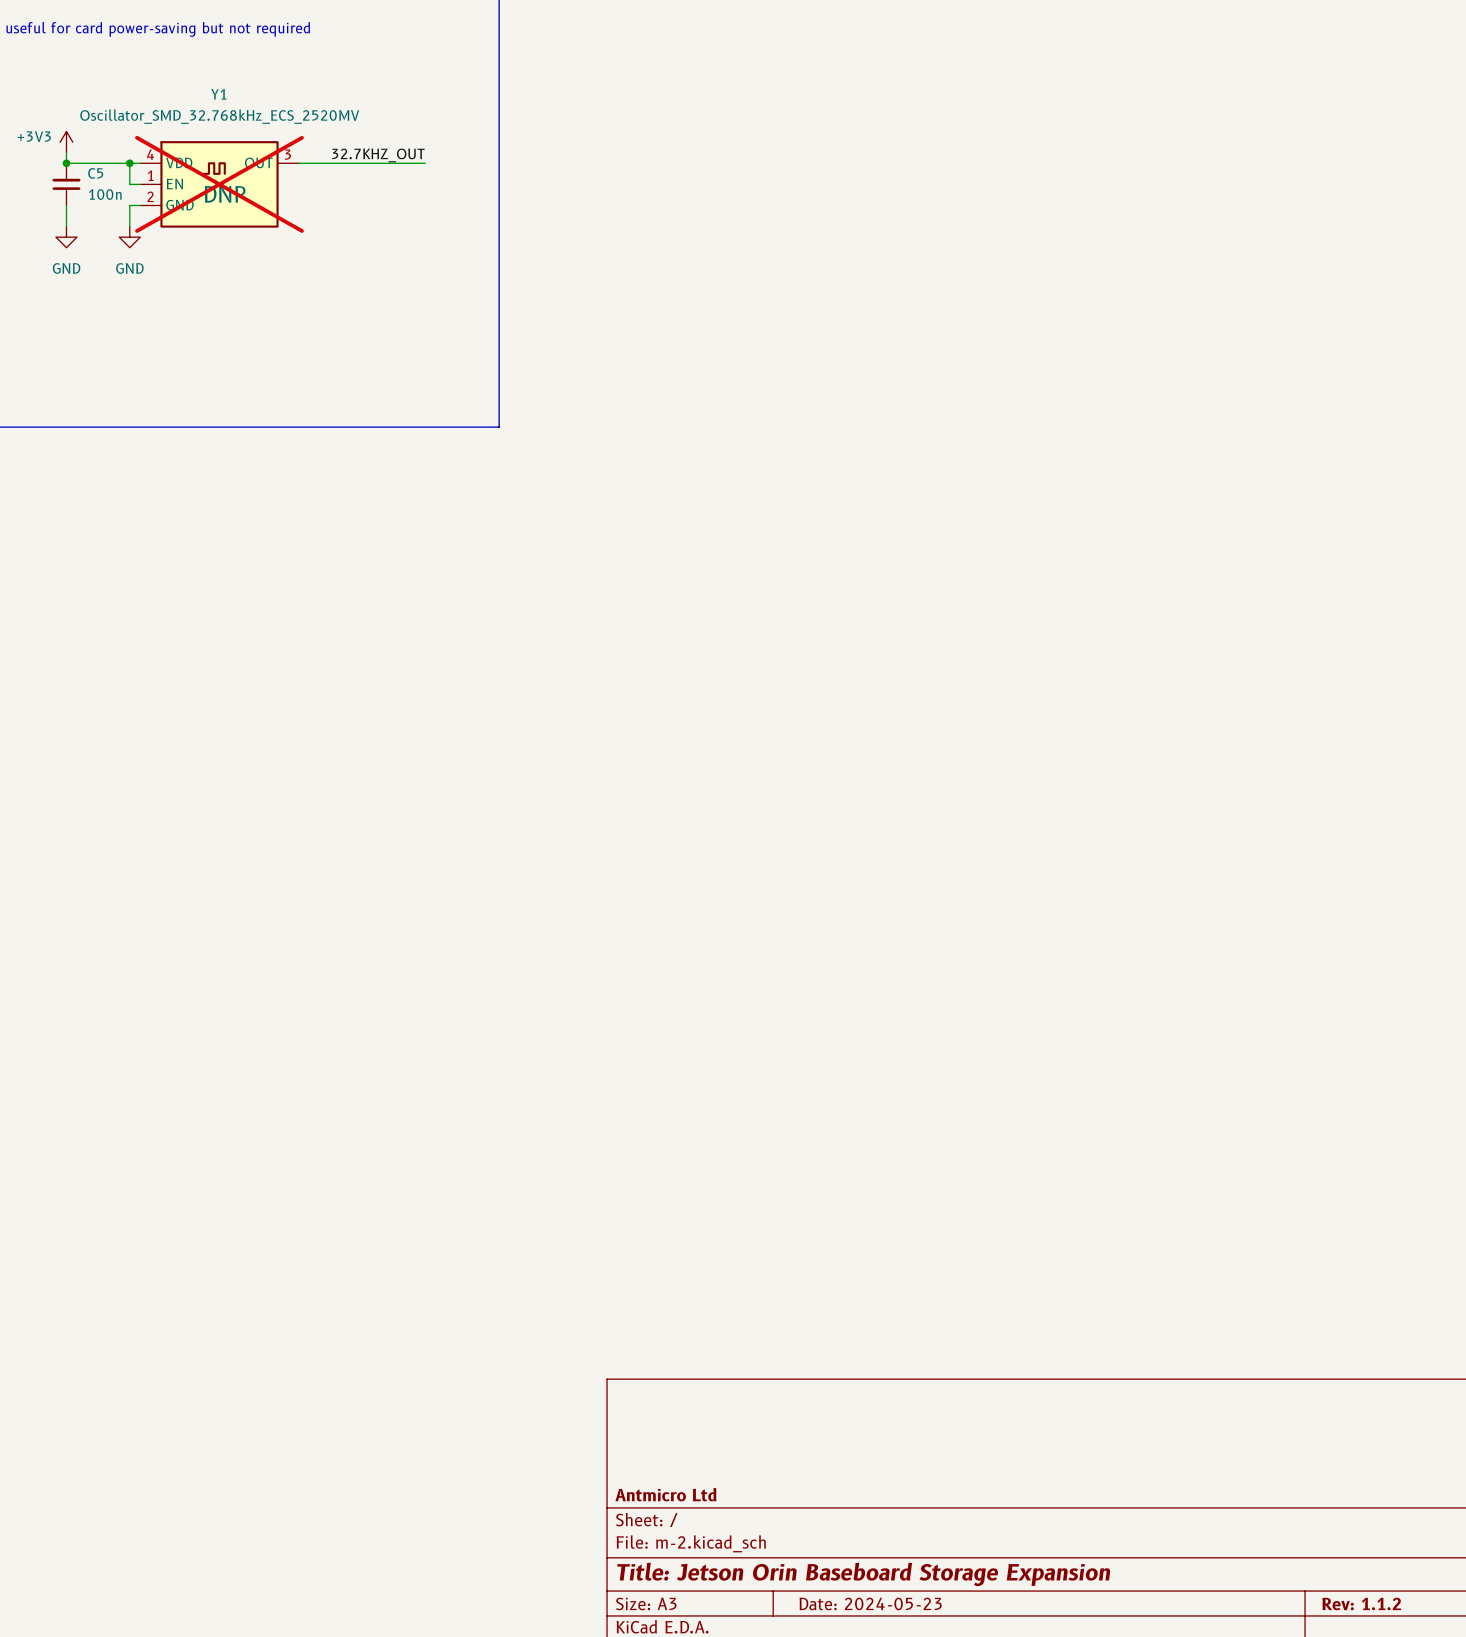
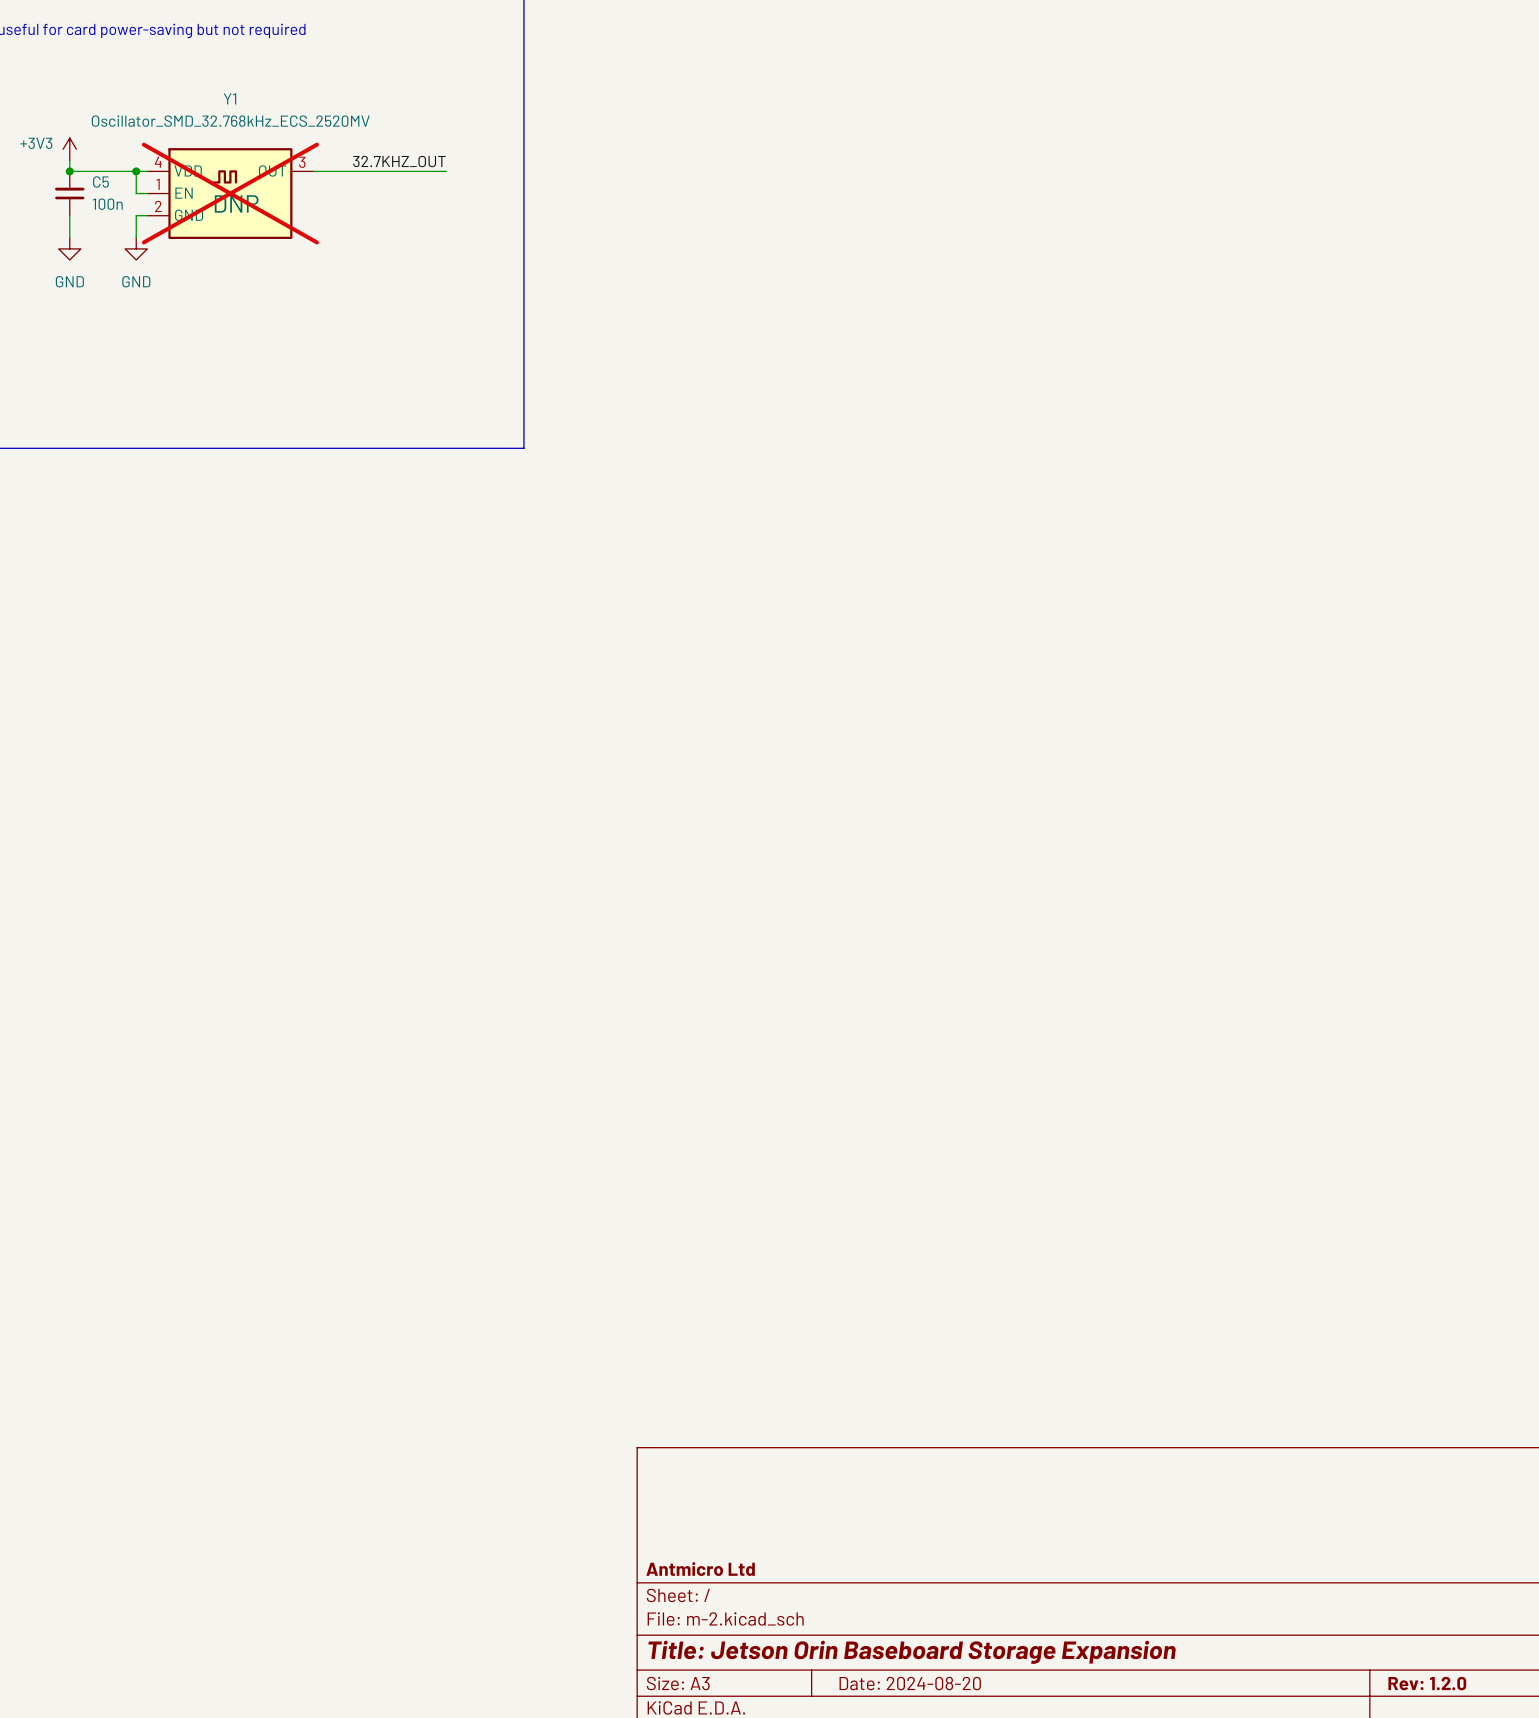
title block: Date: 2024-05-23 (870, 1603) -> Date: 2024-08-20 (910, 1683)
title block: Rev: 1.1.2 (1361, 1603) -> Rev: 1.2.0 (1427, 1683)

